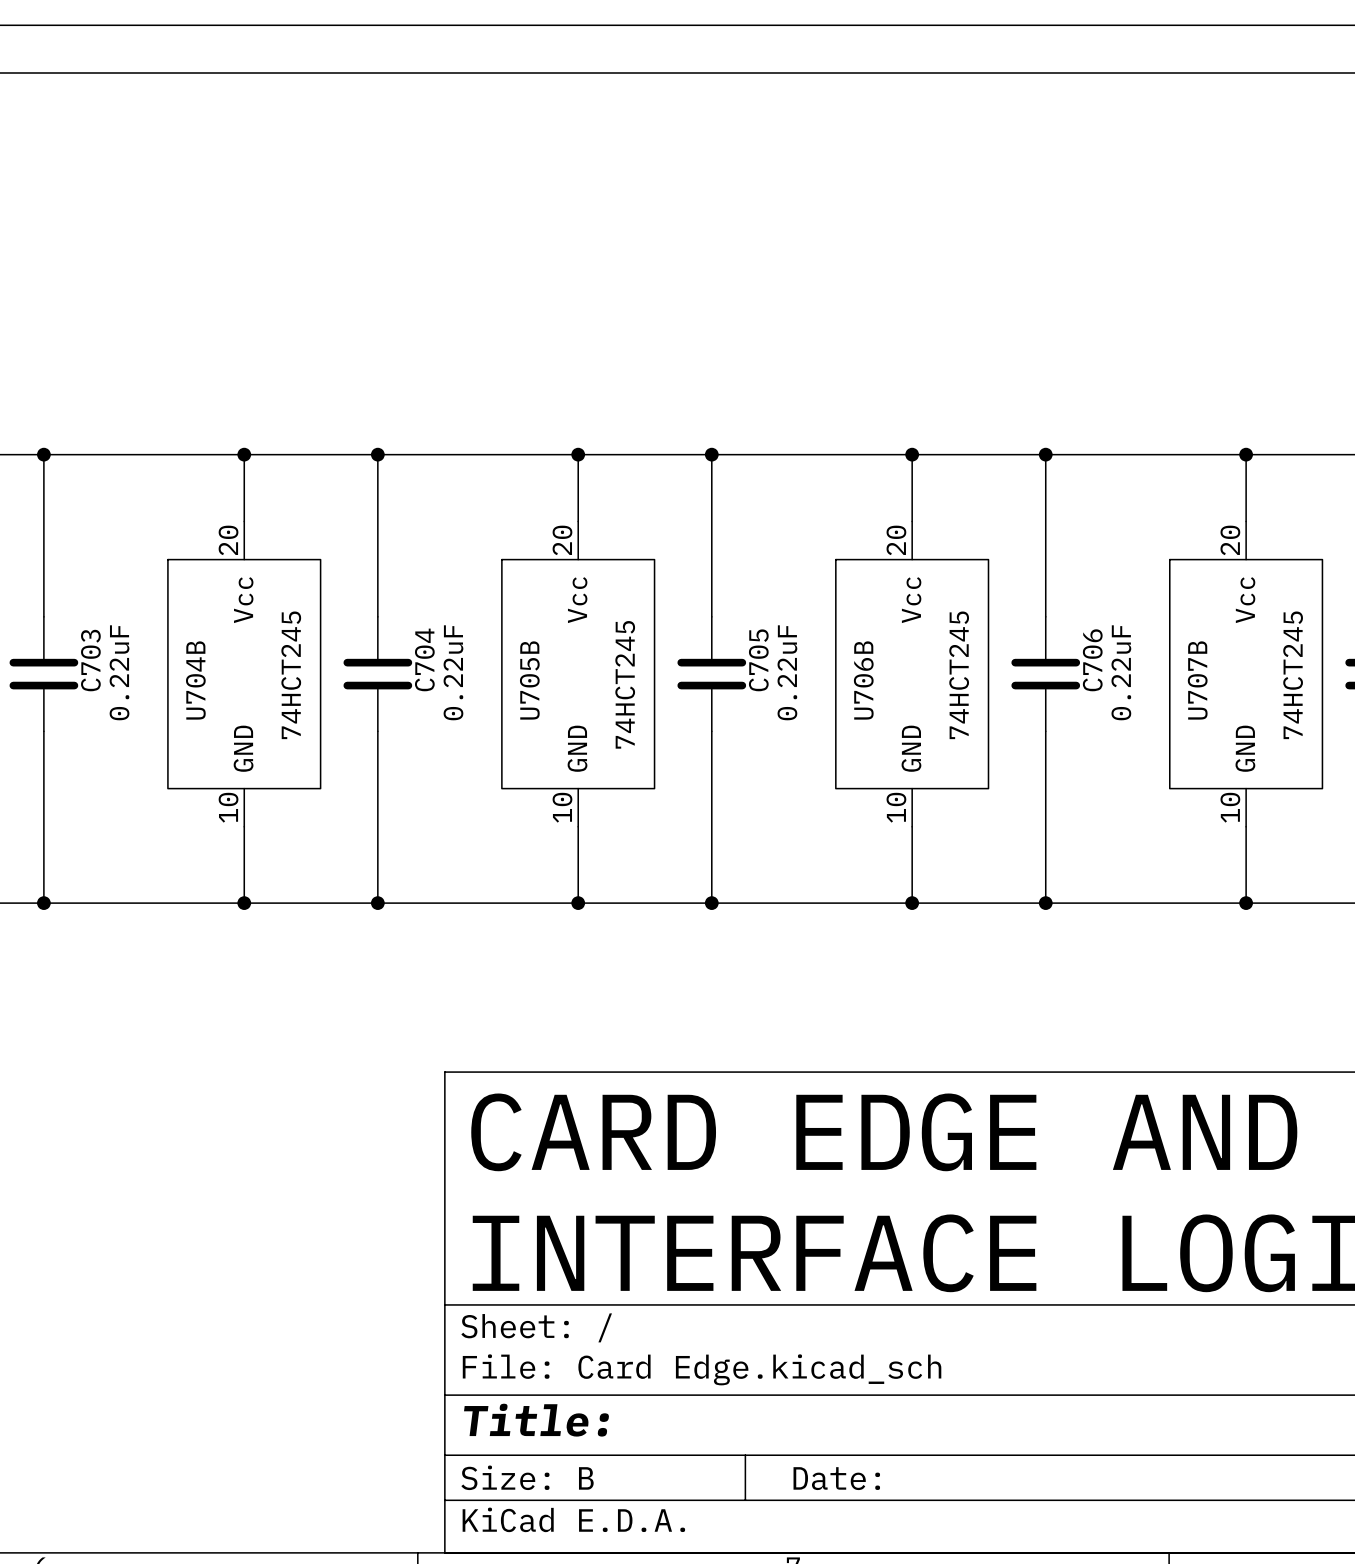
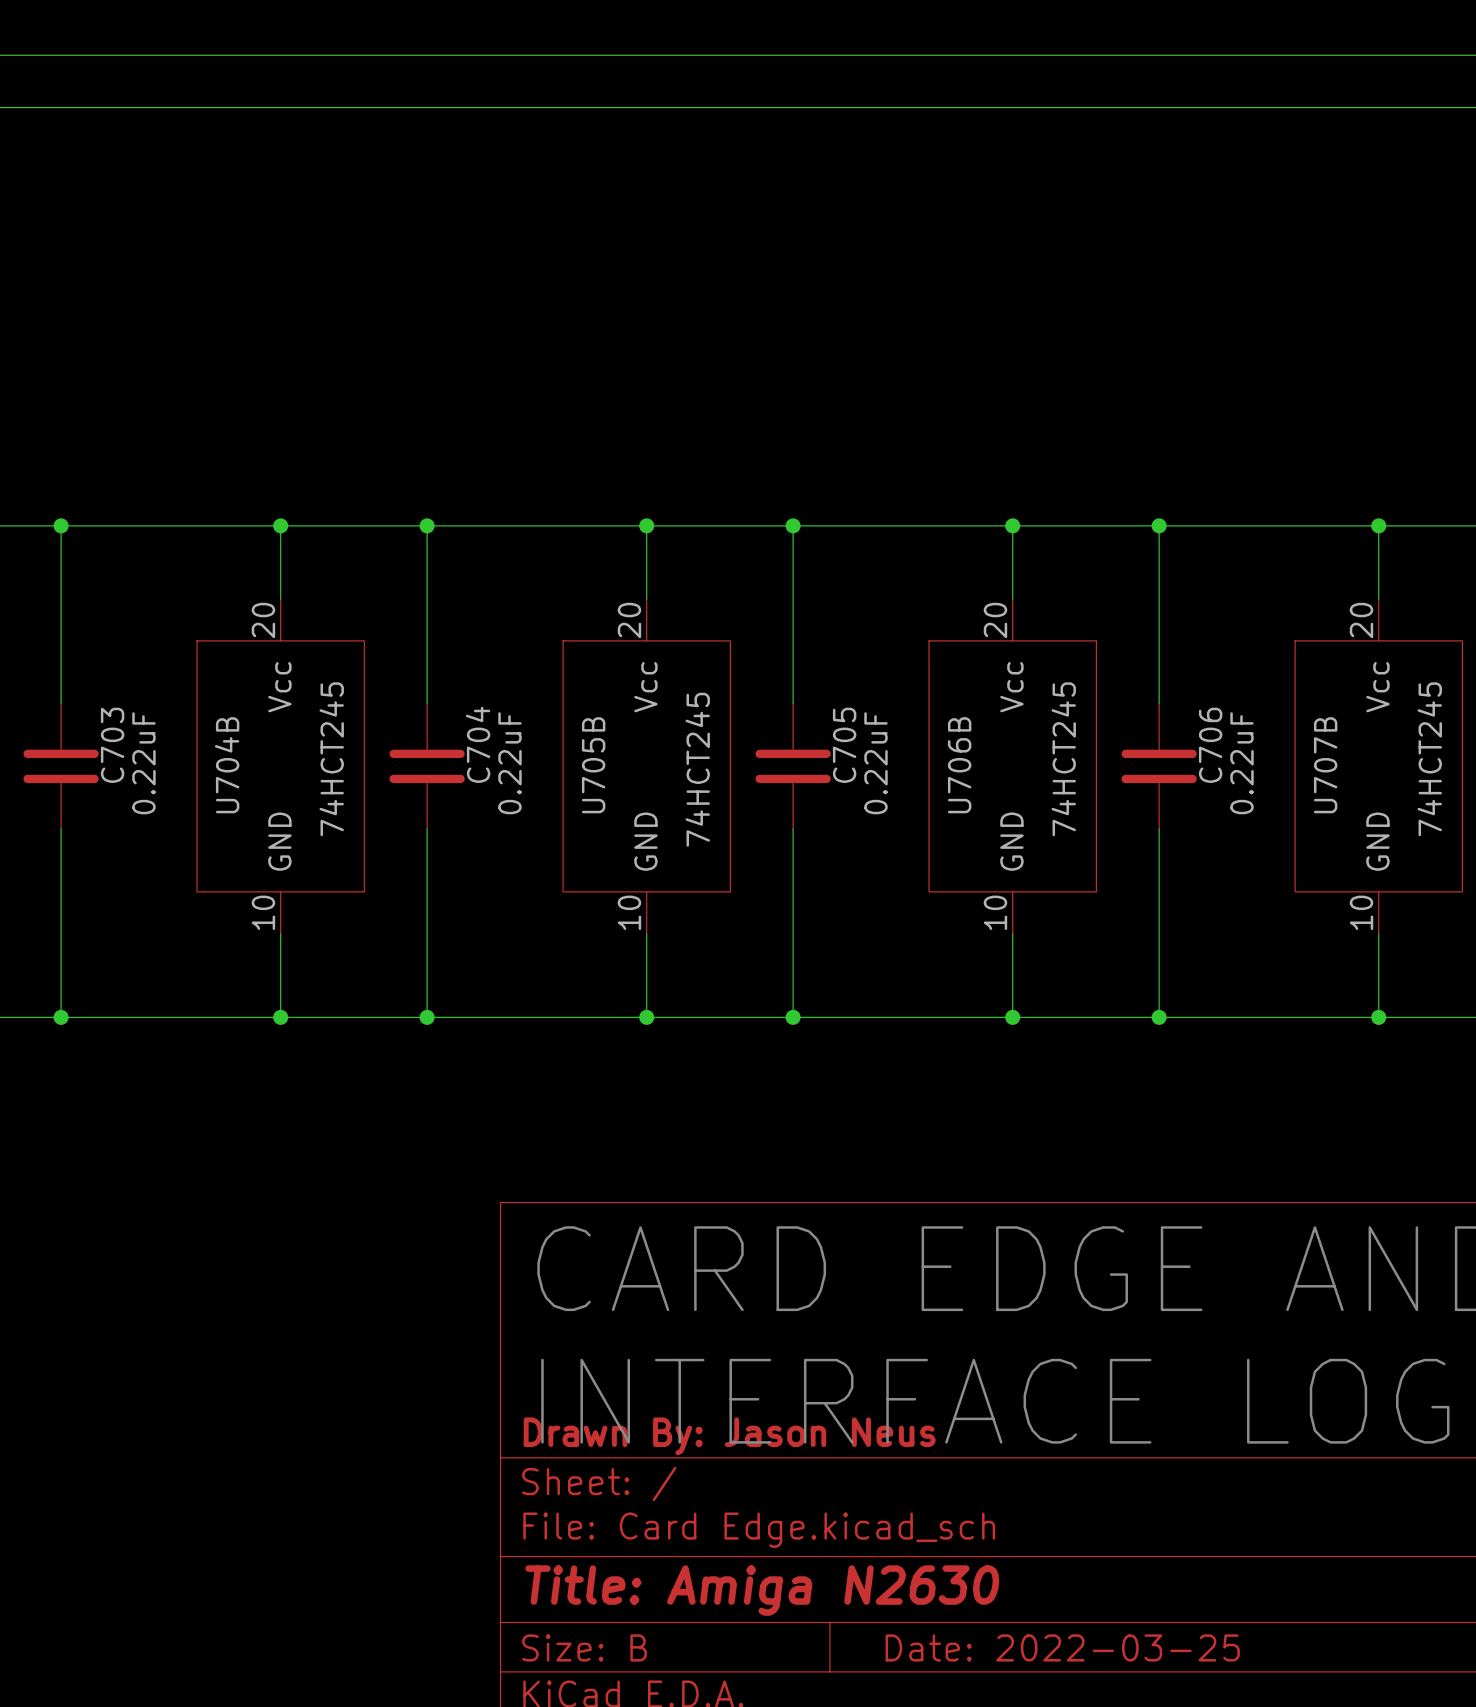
title block: none -> Drawn By: Jason Neus (729, 1436)
title block: Title: (536, 1420) -> Title: Amiga N2630 (762, 1590)
title block: Date: (836, 1478) -> Date: 2022-03-25 (1062, 1647)

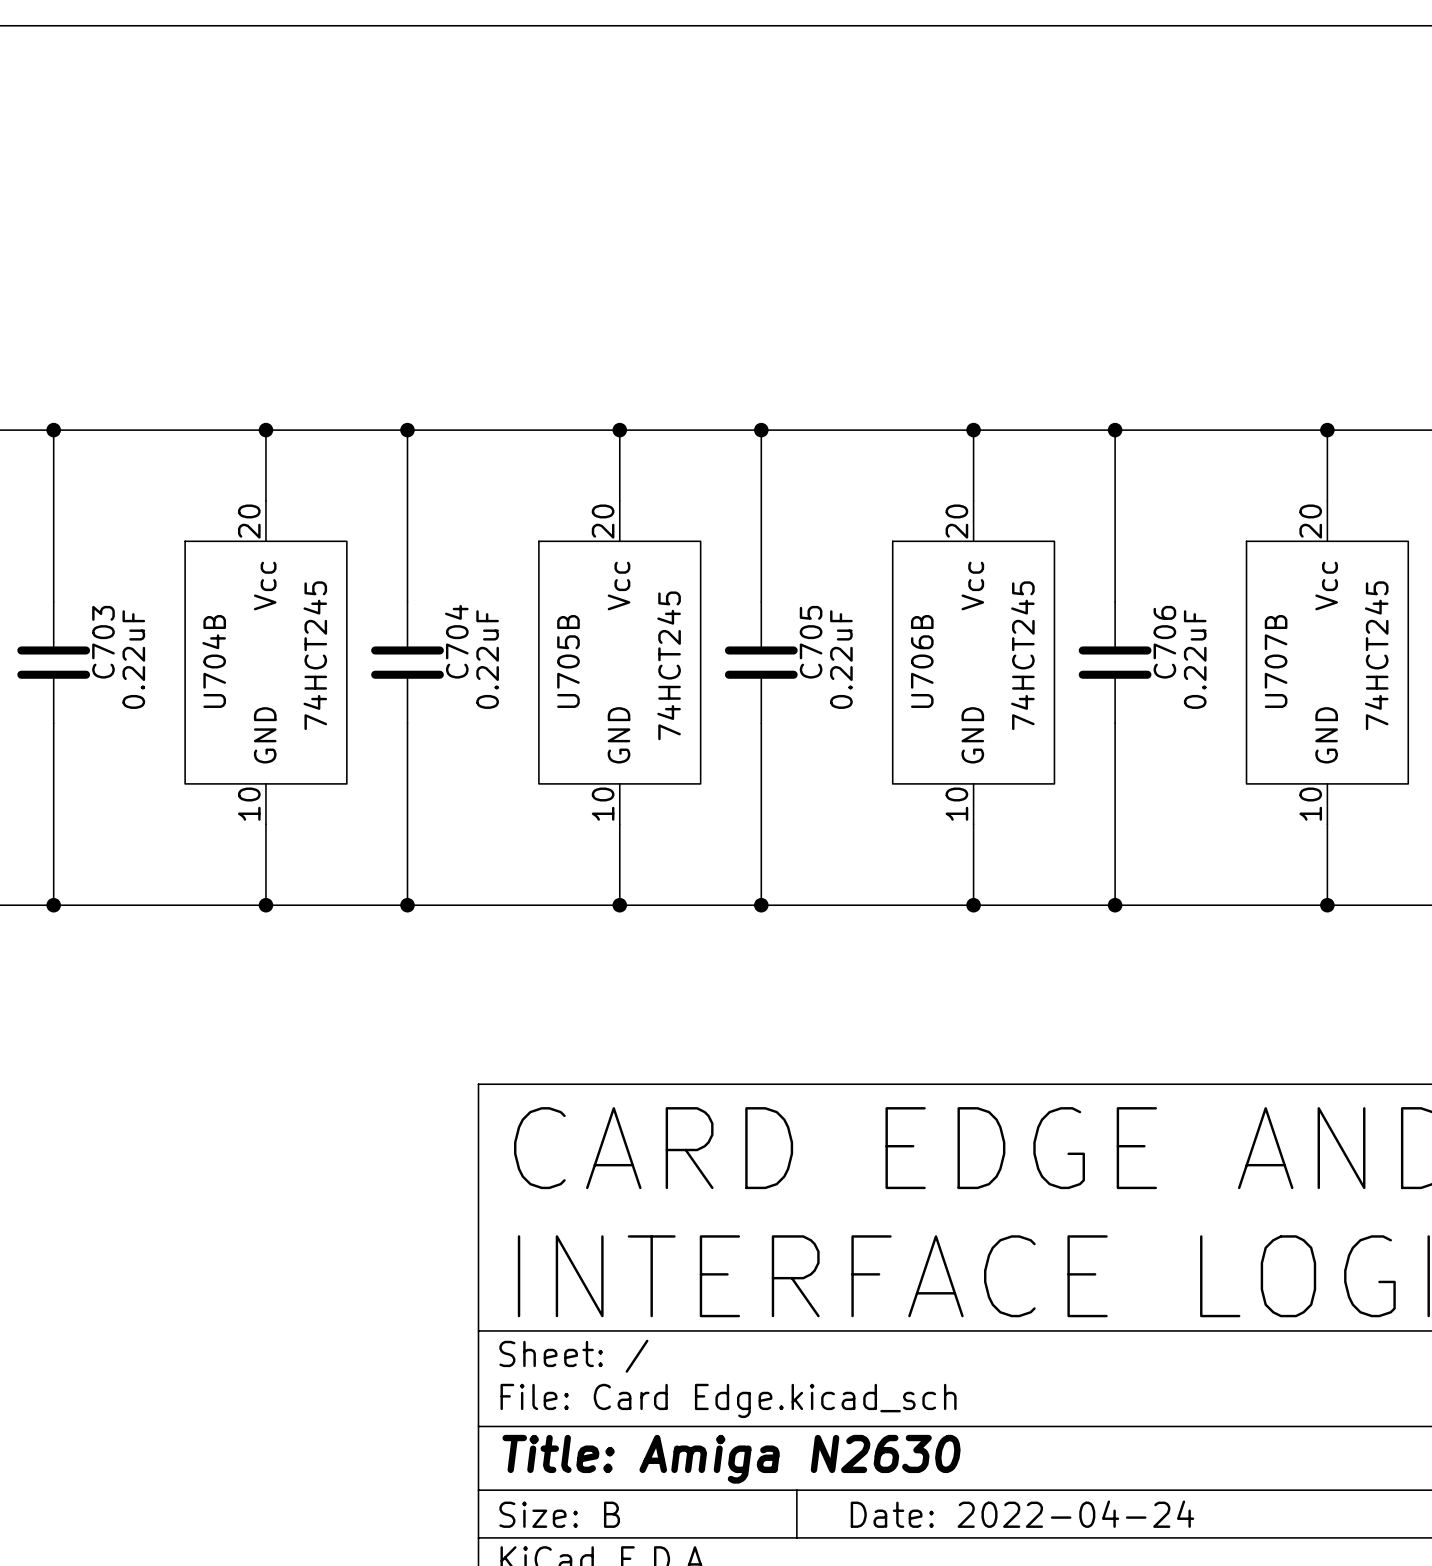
title block: Drawn By: Jason Neus (729, 1436) -> none
title block: Date: 2022-03-25 (1062, 1647) -> Date: 2022-04-24 (1022, 1514)

